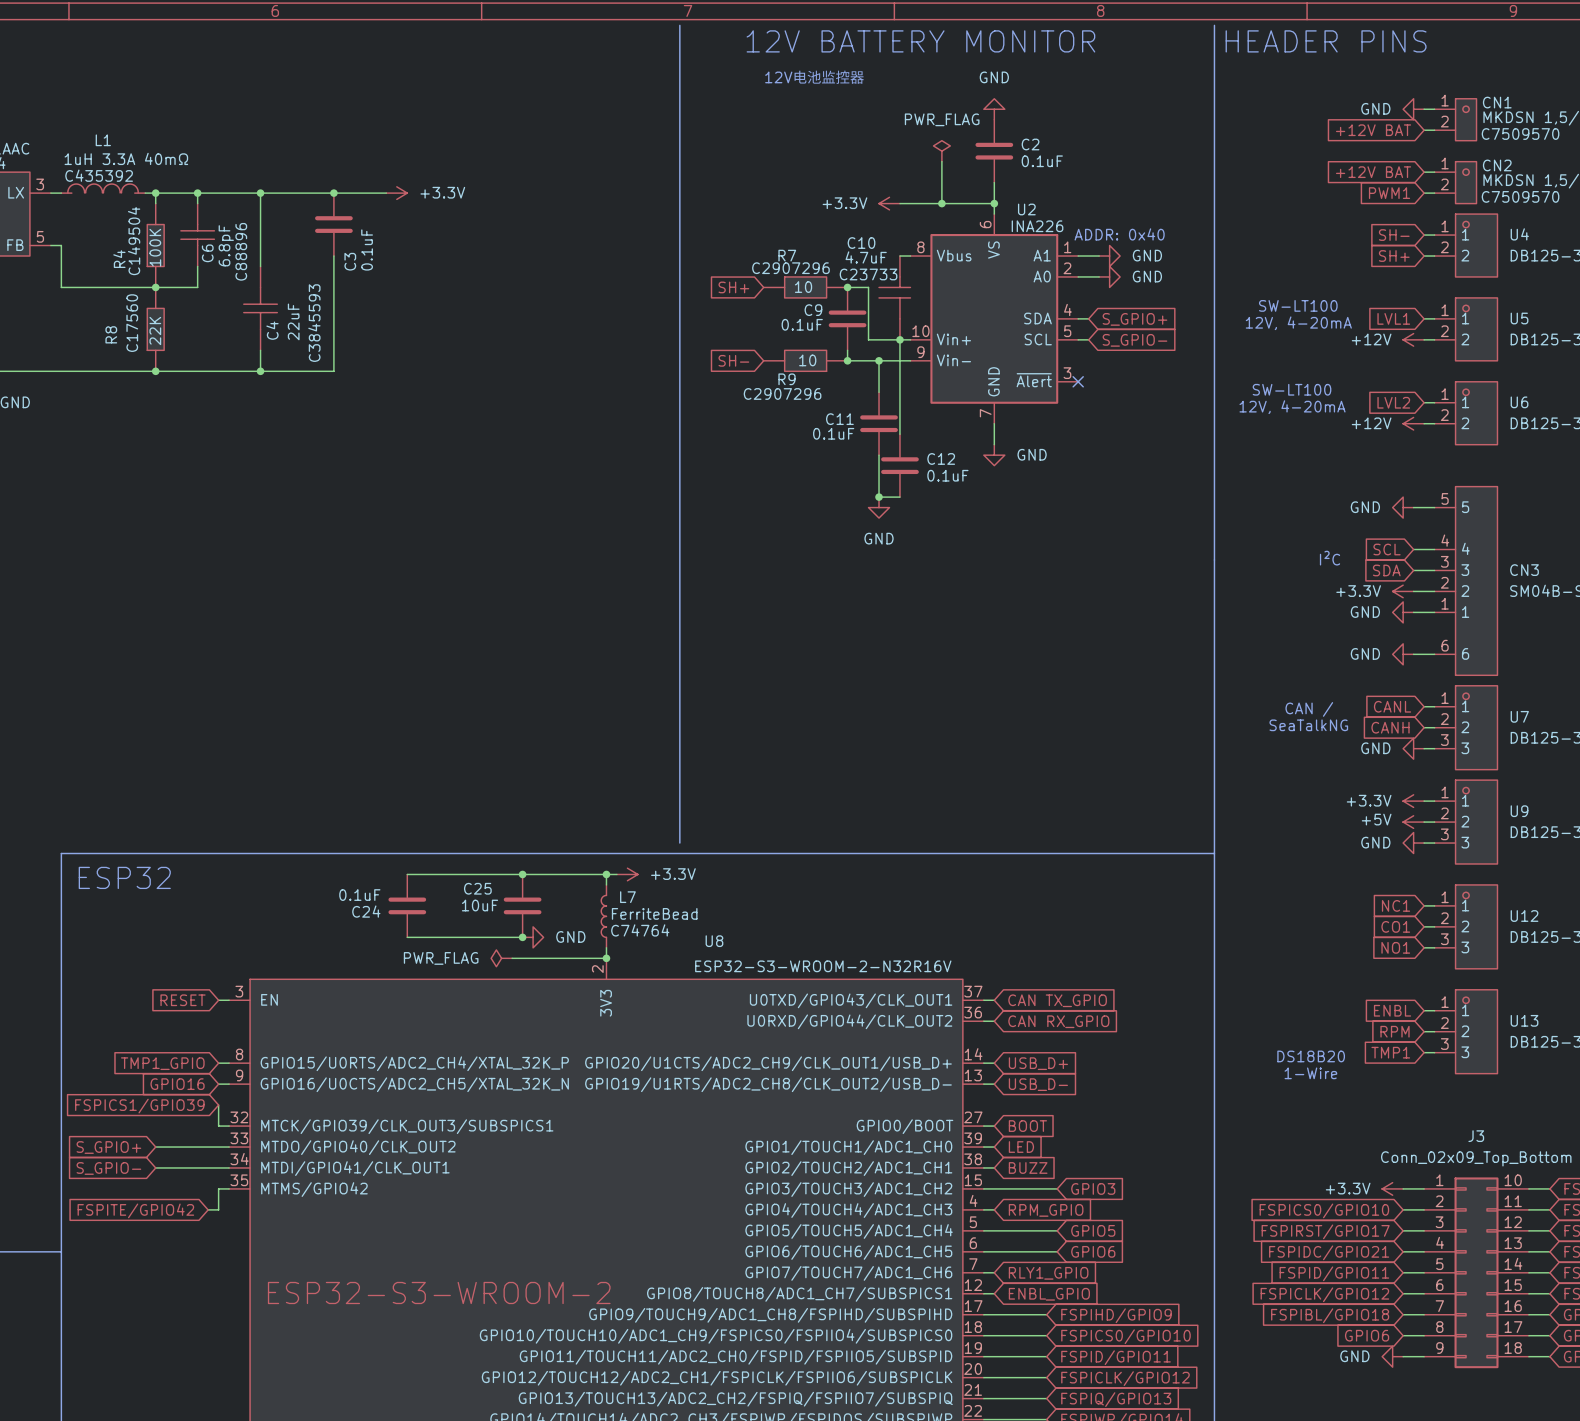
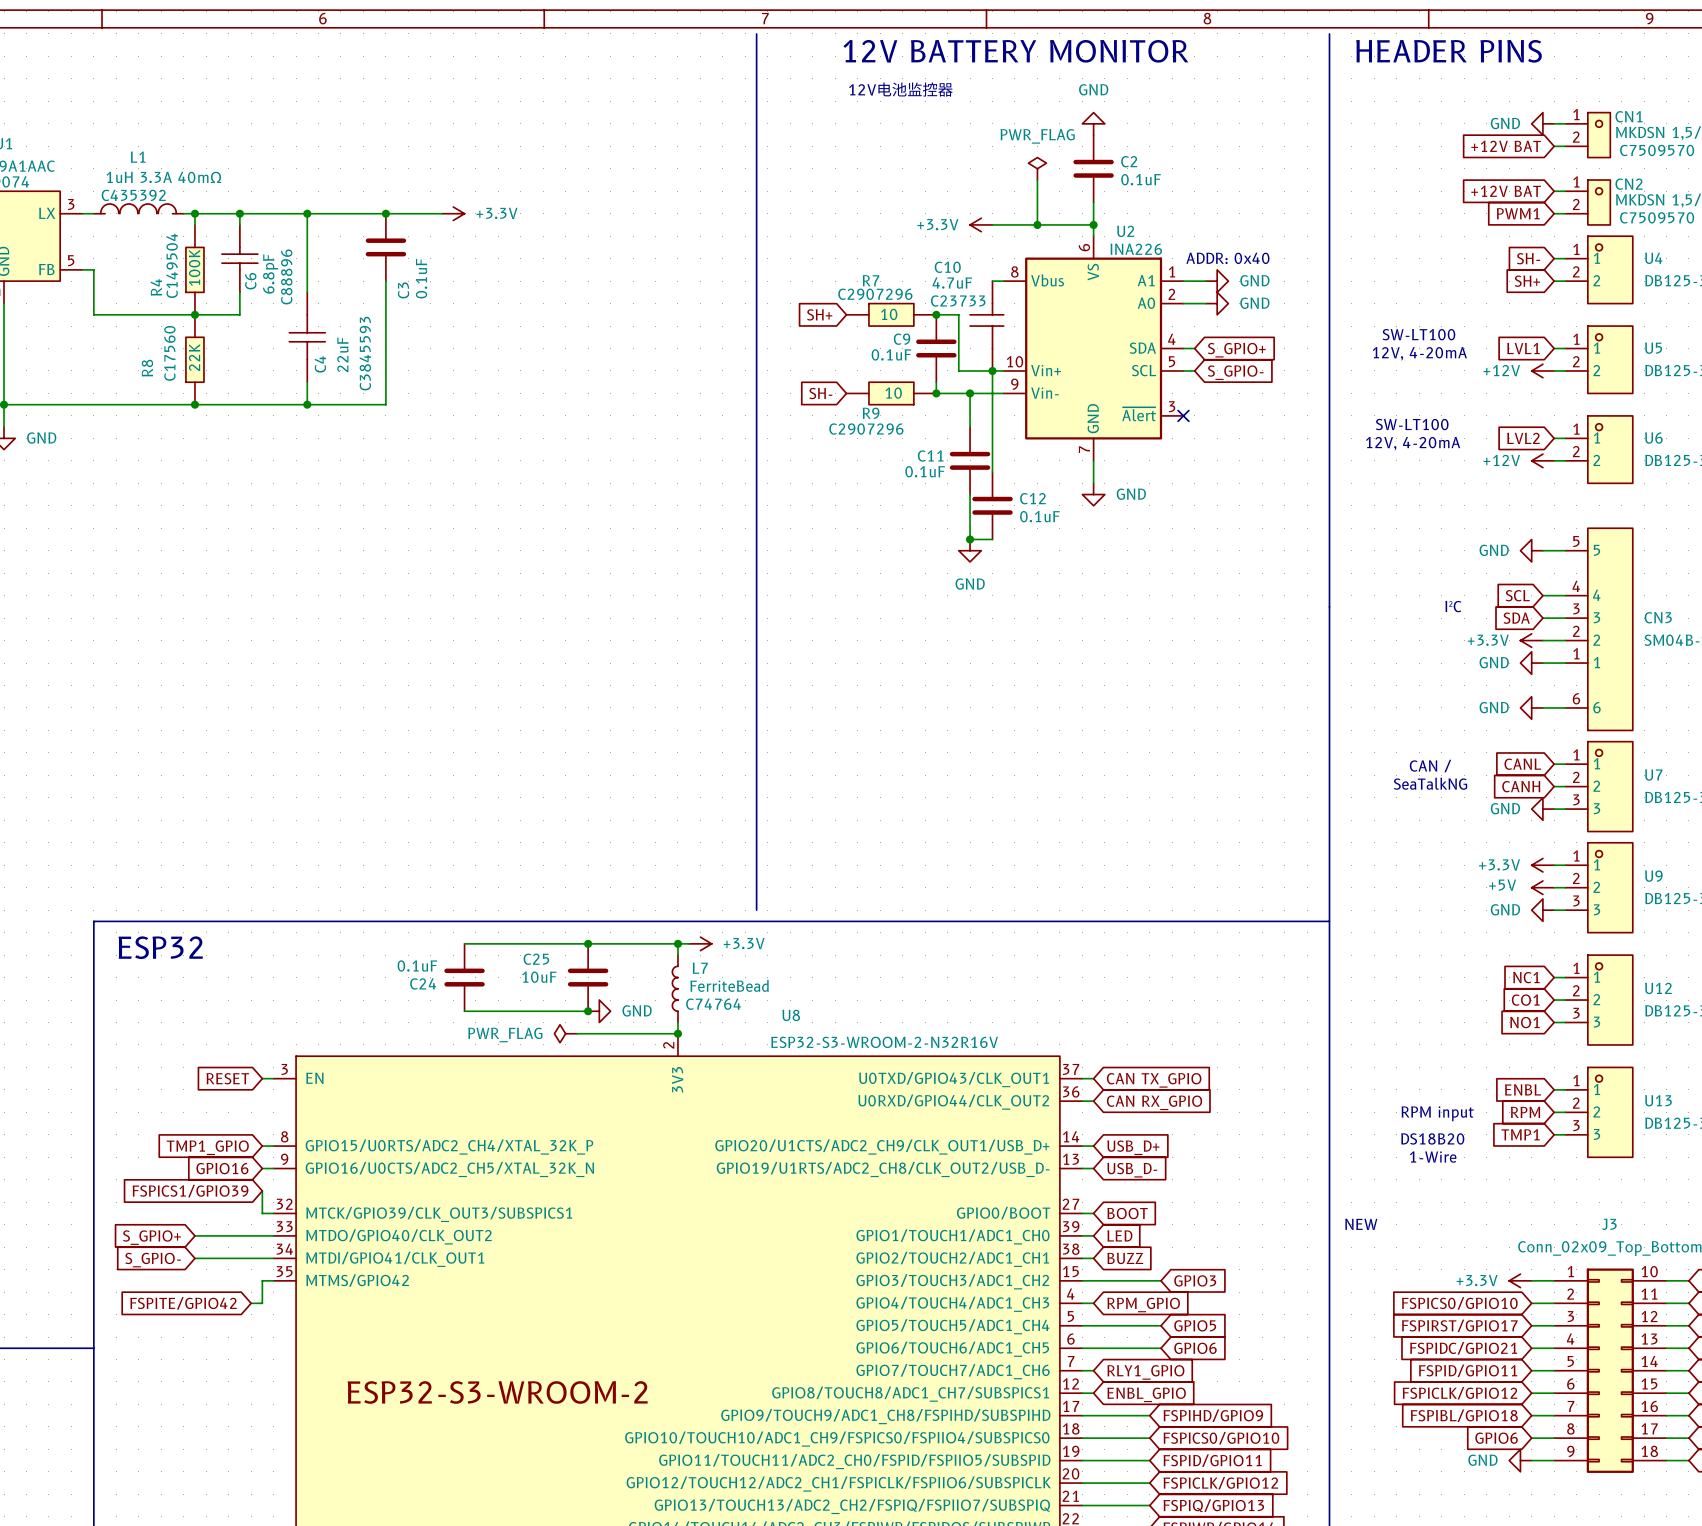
text: none -> RPM input (1437, 1113)
text: none -> NEW (1361, 1224)

